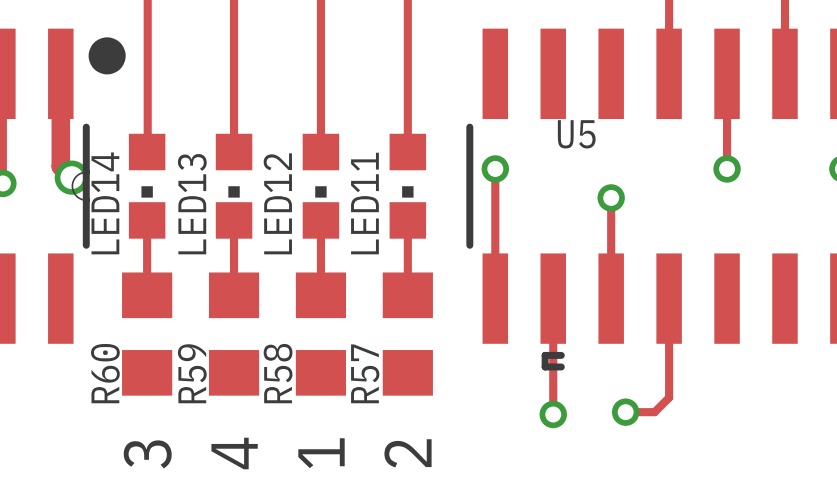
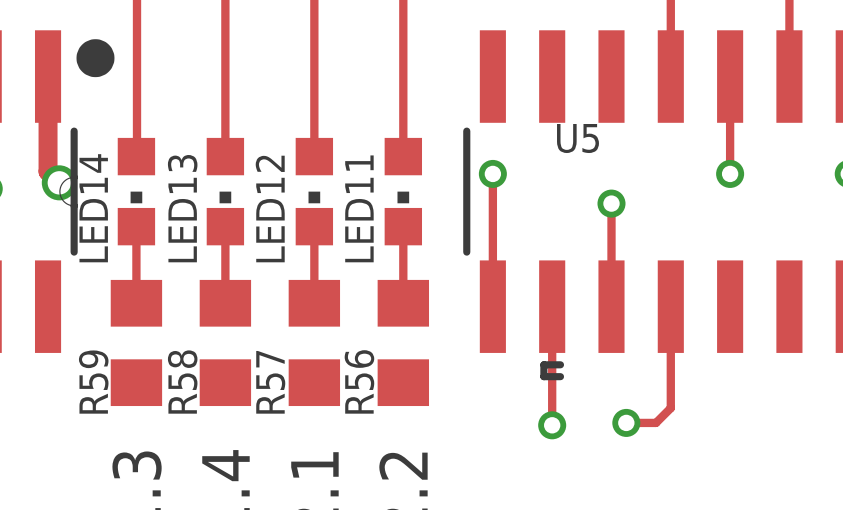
R60 name: R60 (105, 373) -> R59 (93, 382)
R59 name: R59 (192, 373) -> R58 (182, 382)
R58 name: R58 (278, 373) -> R57 (270, 382)
R57 name: R57 (365, 373) -> R56 (359, 381)

